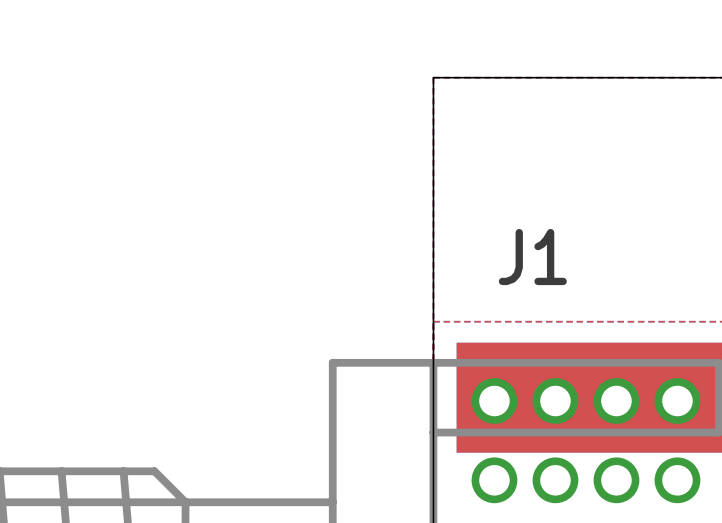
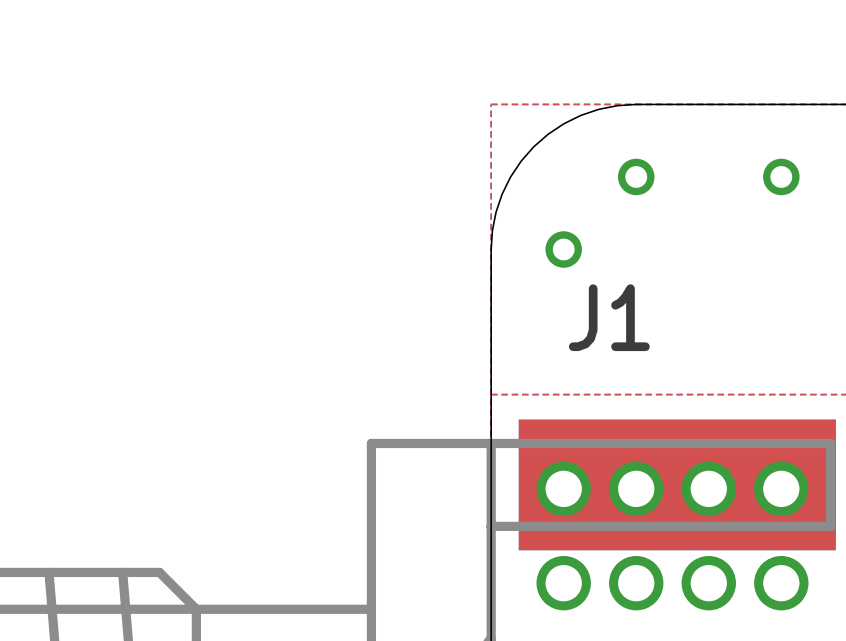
board edge: (555, 77) (433, 77) (433, 199) -> (636, 104) (598, 109) (580, 115) (563, 123) (533, 146) (510, 176) (502, 193) (496, 211) (491, 249)
via: none -> (636, 176)
via: none -> (781, 176)
via: none -> (563, 249)

